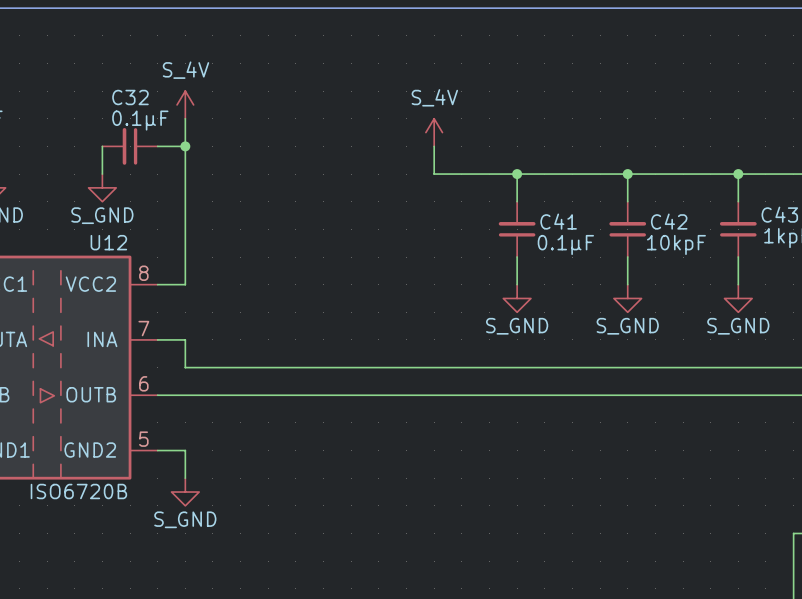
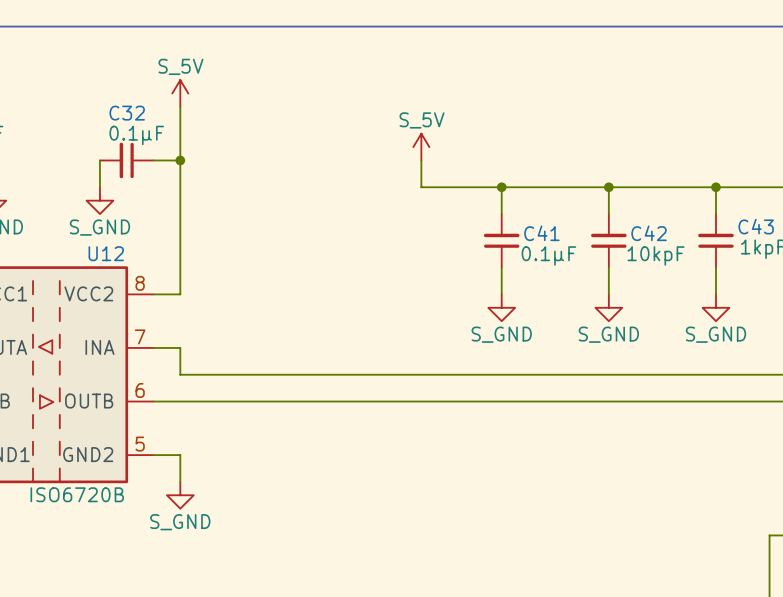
power symbol: none -> S_5V (180, 93)
power symbol: S_4V (185, 104) -> none
power symbol: S_4V (434, 132) -> S_5V (421, 147)

